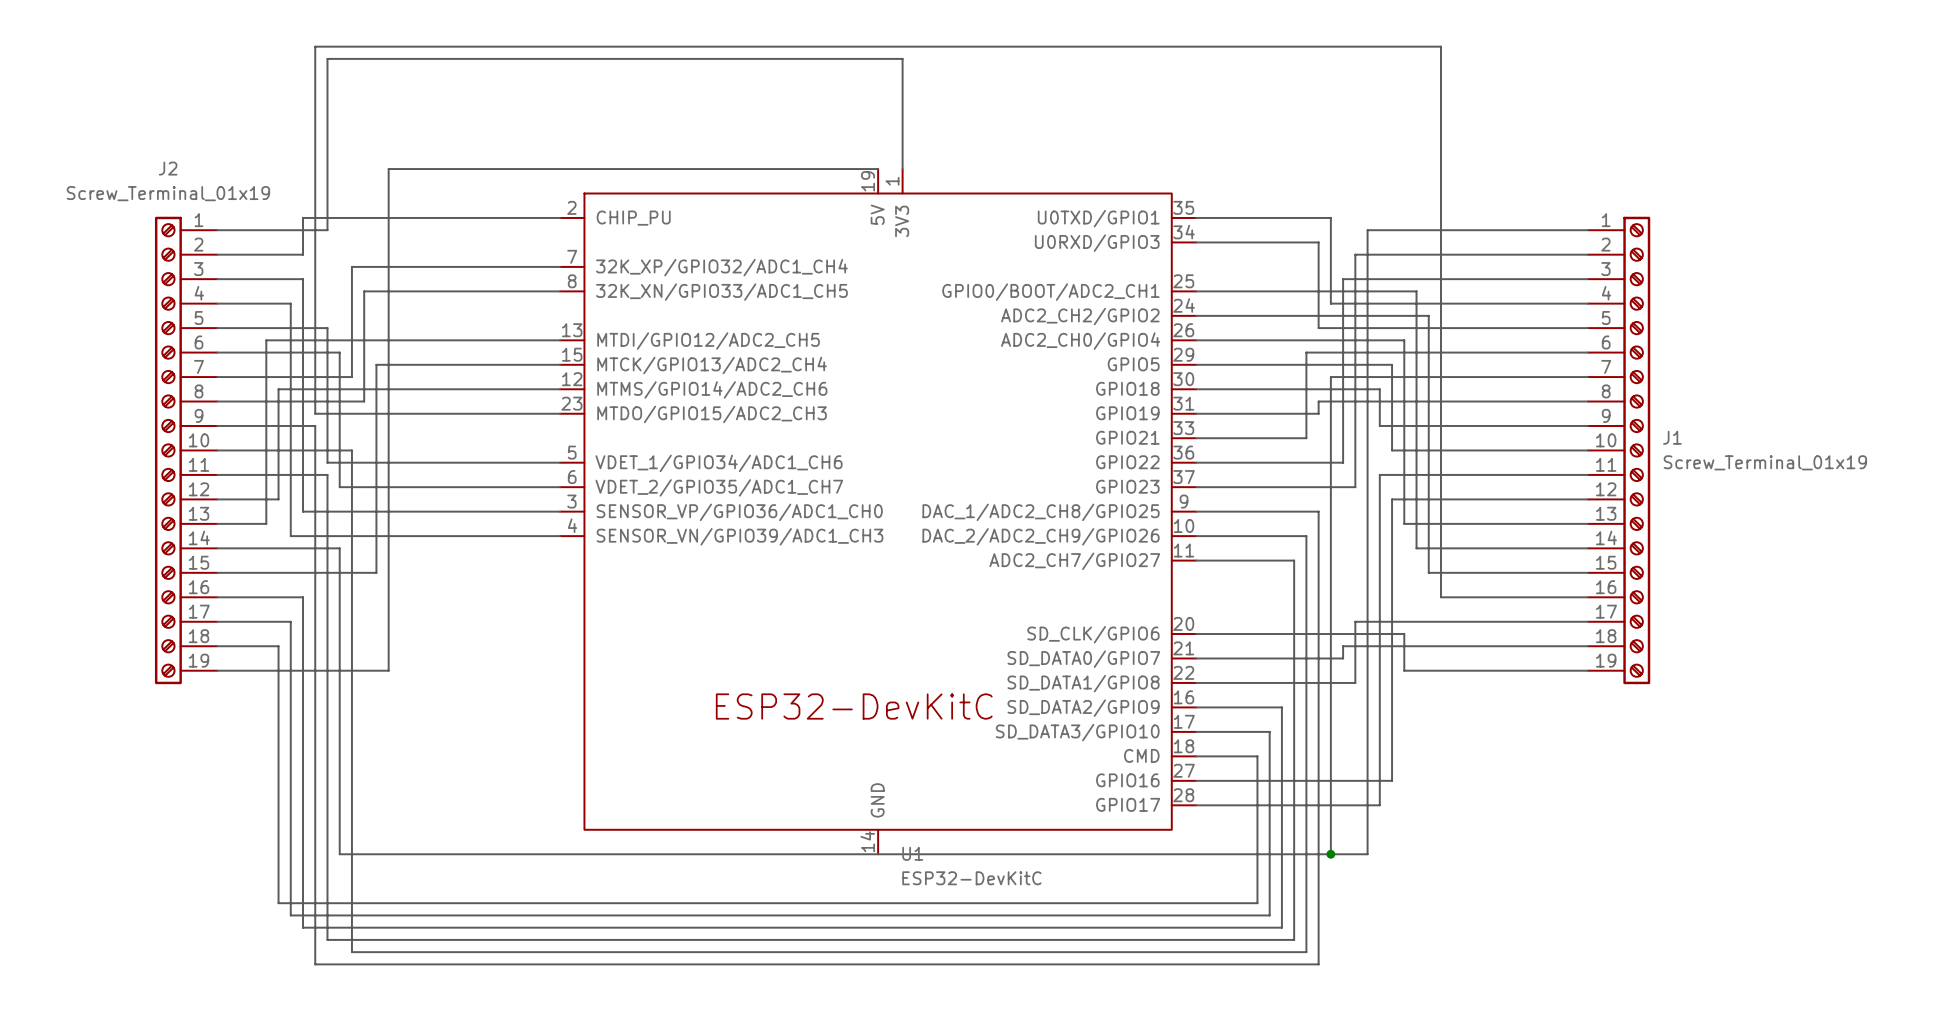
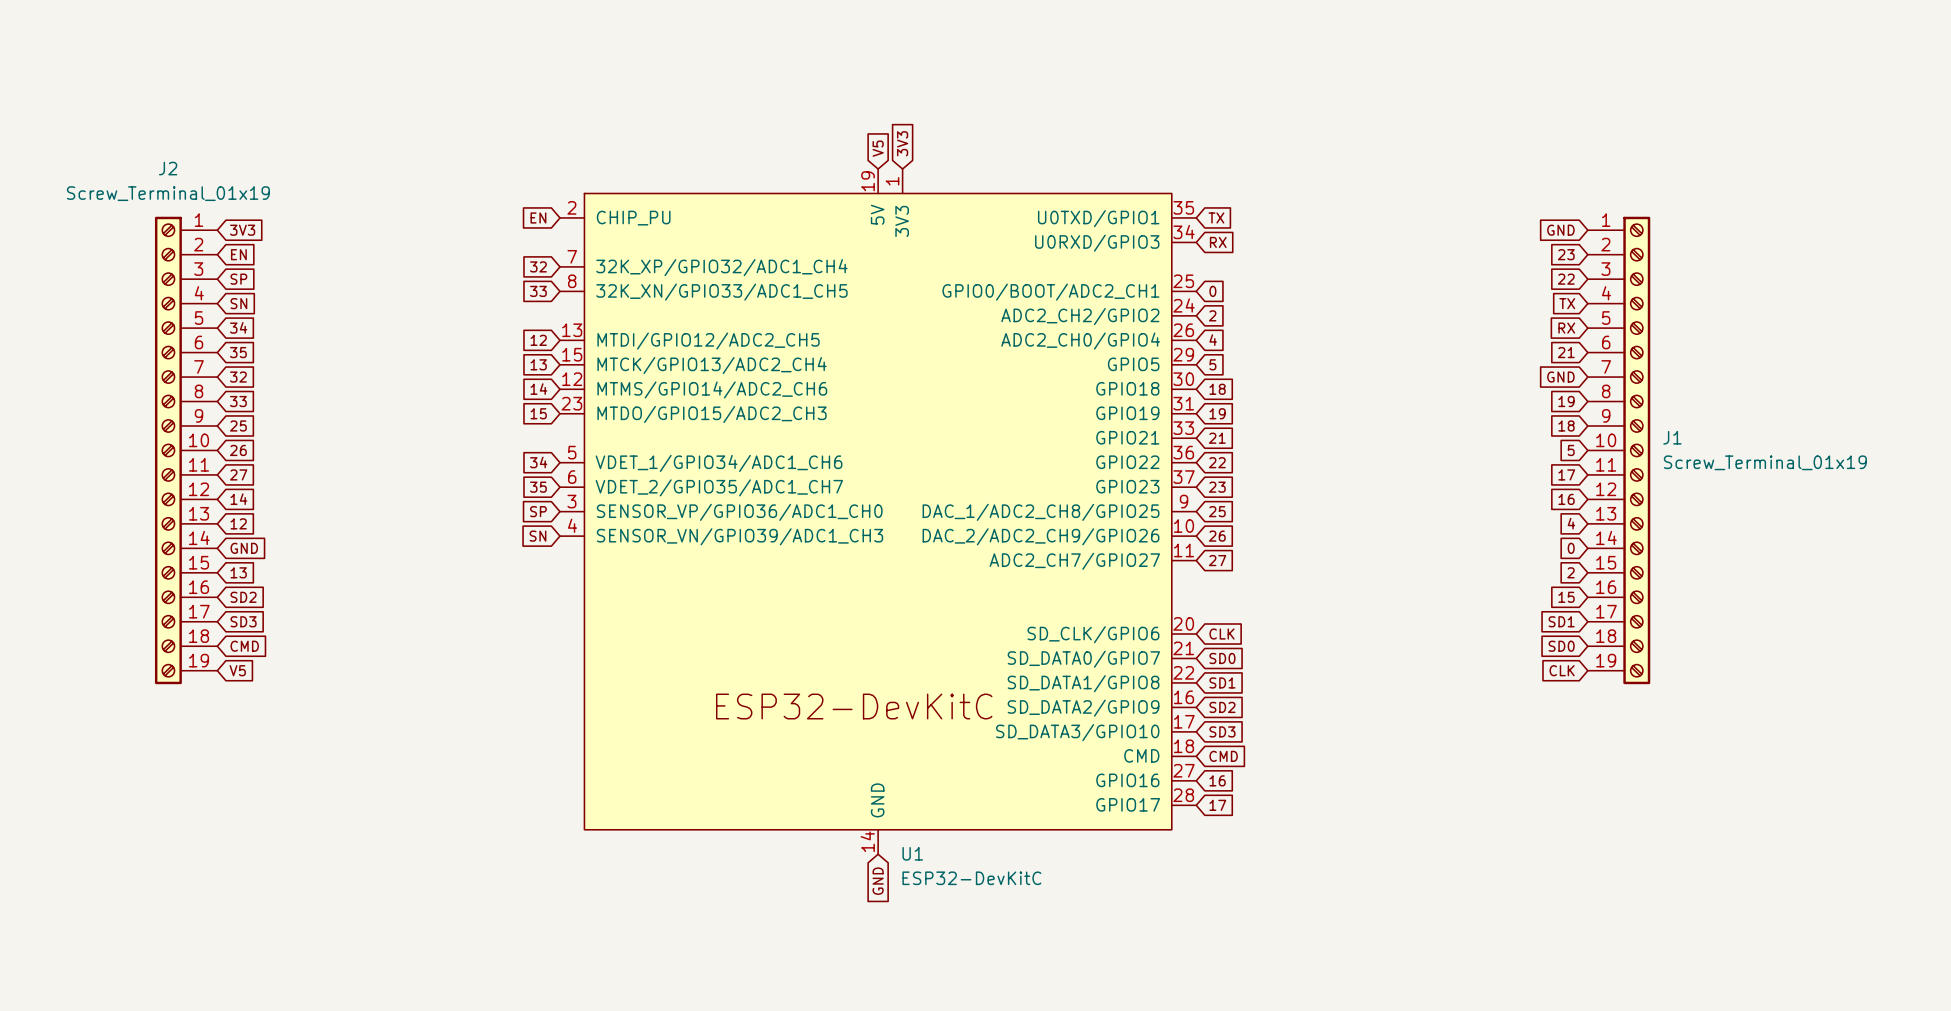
global label: none -> 3V3 (902, 143)
global label: none -> V5 (878, 148)
bus: (878, 169) (388, 169) (388, 670) (217, 670) -> none
bus: (902, 169) (902, 58) (327, 58) (327, 230) (217, 230) -> none
global label: none -> EN (538, 217)
bus: (559, 217) (303, 217) (303, 254) (217, 254) -> none
bus: (1196, 217) (1330, 217) (1330, 303) (1587, 303) -> none
global label: none -> TX (1216, 217)
global label: none -> 3V3 (242, 230)
global label: none -> GND (1560, 230)
bus: (1587, 230) (1367, 230) (1367, 854) (339, 854) (339, 548) (217, 548) -> none
bus: (1196, 242) (1318, 242) (1318, 328) (1587, 328) -> none
global label: none -> RX (1218, 242)
global label: none -> EN (238, 254)
global label: none -> 23 (1566, 254)
bus: (1587, 254) (1355, 254) (1355, 487) (1196, 487) -> none
global label: none -> 32 (538, 266)
bus: (559, 266) (351, 266) (351, 377) (217, 377) -> none
bus: (217, 279) (303, 279) (303, 511) (559, 511) -> none
global label: none -> SP (238, 279)
global label: none -> 22 (1566, 279)
bus: (1587, 279) (1343, 279) (1343, 462) (1196, 462) -> none
global label: none -> 33 (538, 291)
bus: (559, 291) (364, 291) (364, 401) (217, 401) -> none
bus: (1196, 291) (1416, 291) (1416, 548) (1587, 548) -> none
global label: none -> 0 (1212, 291)
bus: (217, 303) (290, 303) (290, 536) (559, 536) -> none
global label: none -> SN (238, 303)
global label: none -> TX (1567, 303)
bus: (1196, 315) (1428, 315) (1428, 572) (1587, 572) -> none
global label: none -> 2 (1212, 315)
global label: none -> 34 (238, 327)
bus: (217, 328) (327, 328) (327, 462) (559, 462) -> none
global label: none -> RX (1566, 328)
global label: none -> 12 (538, 340)
bus: (559, 340) (266, 340) (266, 523) (217, 523) -> none
bus: (1196, 340) (1404, 340) (1404, 523) (1587, 523) -> none
global label: none -> 4 (1213, 340)
bus: (217, 352) (339, 352) (339, 487) (559, 487) -> none
global label: none -> 35 (238, 352)
global label: none -> 21 (1566, 352)
bus: (1587, 352) (1306, 352) (1306, 438) (1196, 438) -> none
global label: none -> 13 (538, 364)
bus: (559, 364) (376, 364) (376, 572) (217, 572) -> none
bus: (1196, 364) (1392, 364) (1392, 450) (1587, 450) -> none
global label: none -> 5 (1212, 364)
global label: none -> 32 (238, 377)
global label: none -> GND (1560, 377)
bus: (1587, 377) (1330, 377) (1330, 854) -> none
global label: none -> 14 (538, 389)
bus: (559, 389) (278, 389) (278, 499) (217, 499) -> none
bus: (1196, 389) (1379, 389) (1379, 425) (1587, 425) -> none
global label: none -> 18 (1217, 389)
global label: none -> 33 (238, 401)
global label: none -> 19 (1566, 401)
bus: (1587, 401) (1318, 401) (1318, 413) (1196, 413) -> none
global label: none -> 15 (538, 413)
bus: (559, 413) (315, 413) (315, 46) (1440, 46) (1440, 597) (1587, 597) -> none
global label: none -> 19 (1217, 413)
bus: (217, 425) (315, 425) (315, 964) (1318, 964) (1318, 511) (1196, 511) -> none
global label: none -> 25 (238, 425)
global label: none -> 18 (1566, 425)
global label: none -> 21 (1217, 438)
bus: (217, 450) (351, 450) (351, 952) (1306, 952) (1306, 536) (1196, 536) -> none
global label: none -> 26 (238, 450)
global label: none -> 5 (1571, 450)
global label: none -> 34 (538, 462)
global label: none -> 22 (1217, 462)
bus: (217, 474) (327, 474) (327, 939) (1294, 939) (1294, 560) (1196, 560) -> none
global label: none -> 27 (238, 474)
global label: none -> 17 (1566, 474)
bus: (1587, 474) (1379, 474) (1379, 805) (1196, 805) -> none
global label: none -> 35 (538, 487)
global label: none -> 23 (1217, 487)
global label: none -> 14 (238, 499)
global label: none -> 16 (1566, 499)
bus: (1587, 499) (1392, 499) (1392, 780) (1196, 780) -> none
global label: none -> SP (538, 511)
global label: none -> 25 (1217, 511)
global label: none -> 12 (238, 523)
global label: none -> 4 (1571, 523)
global label: none -> SN (537, 536)
global label: none -> 26 (1217, 536)
global label: none -> GND (244, 548)
global label: none -> 0 (1571, 548)
global label: none -> 27 (1217, 560)
global label: none -> 13 (238, 572)
global label: none -> 2 (1570, 572)
bus: (217, 597) (303, 597) (303, 927) (1281, 927) (1281, 707) (1196, 707) -> none
global label: none -> SD2 (243, 597)
global label: none -> 15 (1566, 597)
bus: (217, 621) (290, 621) (290, 915) (1269, 915) (1269, 731) (1196, 731) -> none
global label: none -> SD3 (243, 621)
global label: none -> SD1 (1561, 621)
bus: (1587, 621) (1355, 621) (1355, 682) (1196, 682) -> none
bus: (1196, 634) (1404, 634) (1404, 670) (1587, 670) -> none
global label: none -> CLK (1222, 634)
bus: (217, 646) (278, 646) (278, 903) (1257, 903) (1257, 756) (1196, 756) -> none
global label: none -> CMD (244, 646)
global label: none -> SD0 (1561, 646)
bus: (1587, 646) (1343, 646) (1343, 658) (1196, 658) -> none
global label: none -> SD0 (1222, 658)
global label: none -> V5 (237, 670)
global label: none -> CLK (1562, 670)
global label: none -> SD1 (1222, 682)
global label: none -> SD2 (1222, 707)
global label: none -> SD3 (1222, 731)
global label: none -> CMD (1223, 756)
global label: none -> 16 (1217, 780)
global label: none -> 17 (1217, 805)
junction: (1330, 854) -> none
global label: none -> GND (878, 881)

